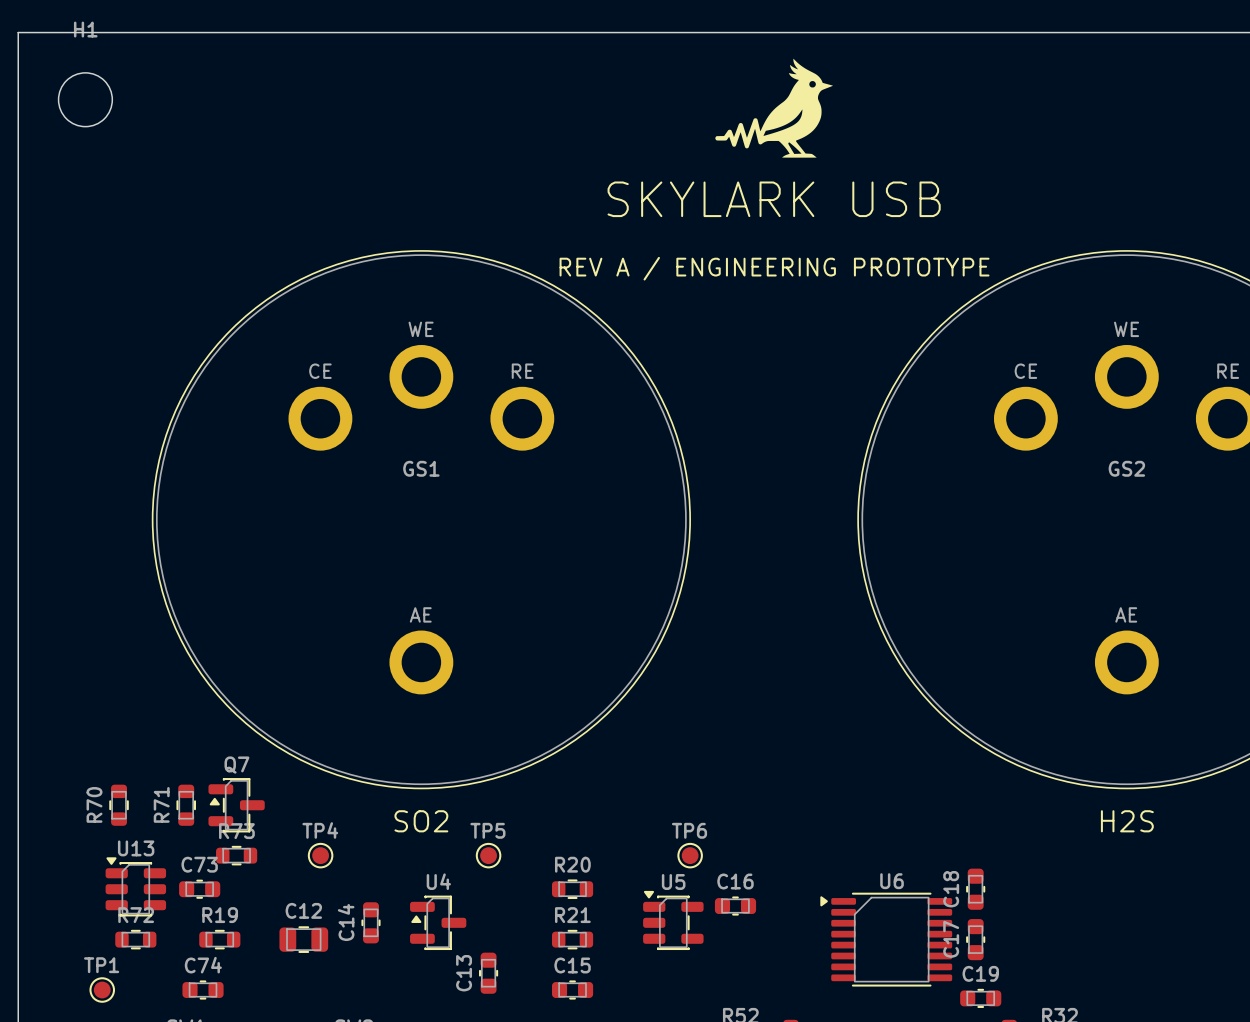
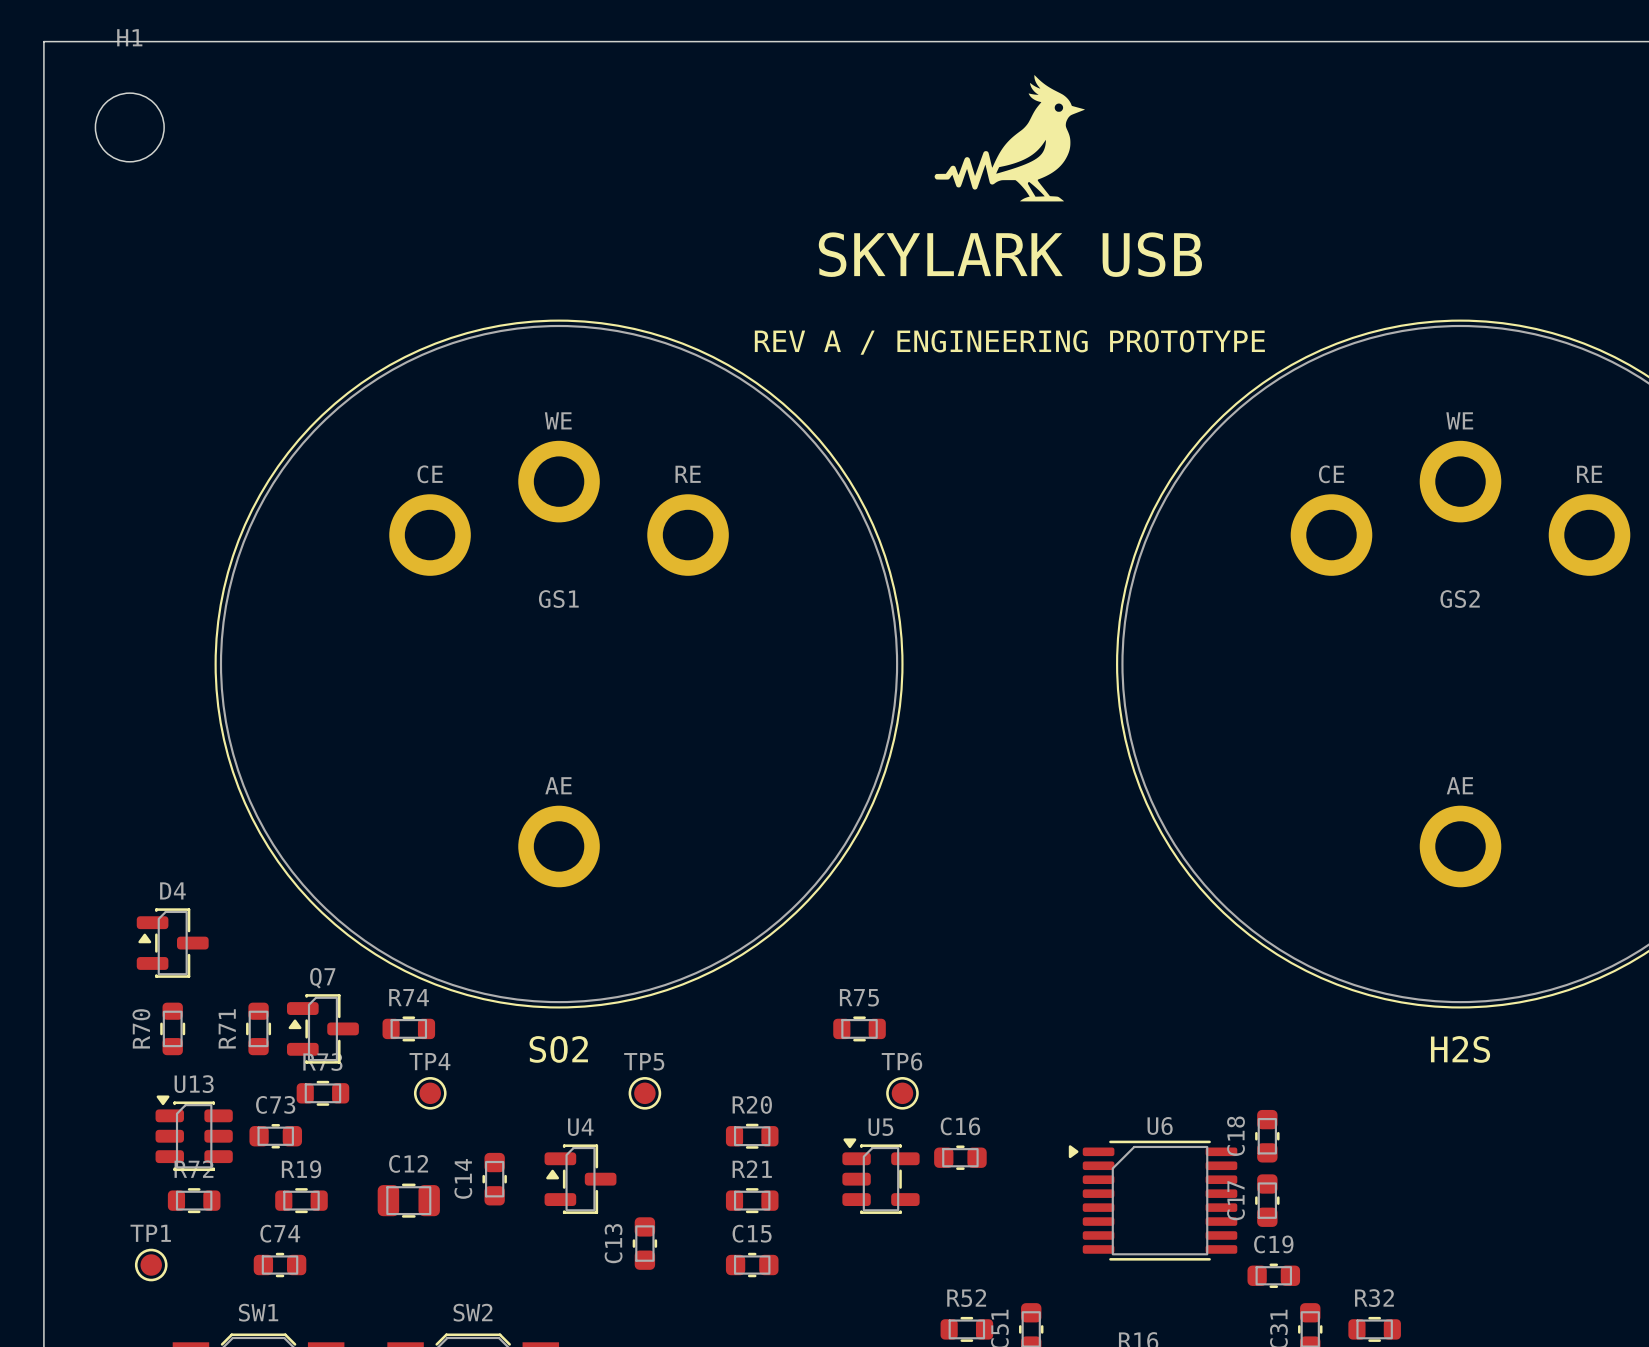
D4: none -> (172, 943)
R74: none -> (408, 1028)
R75: none -> (859, 1028)

